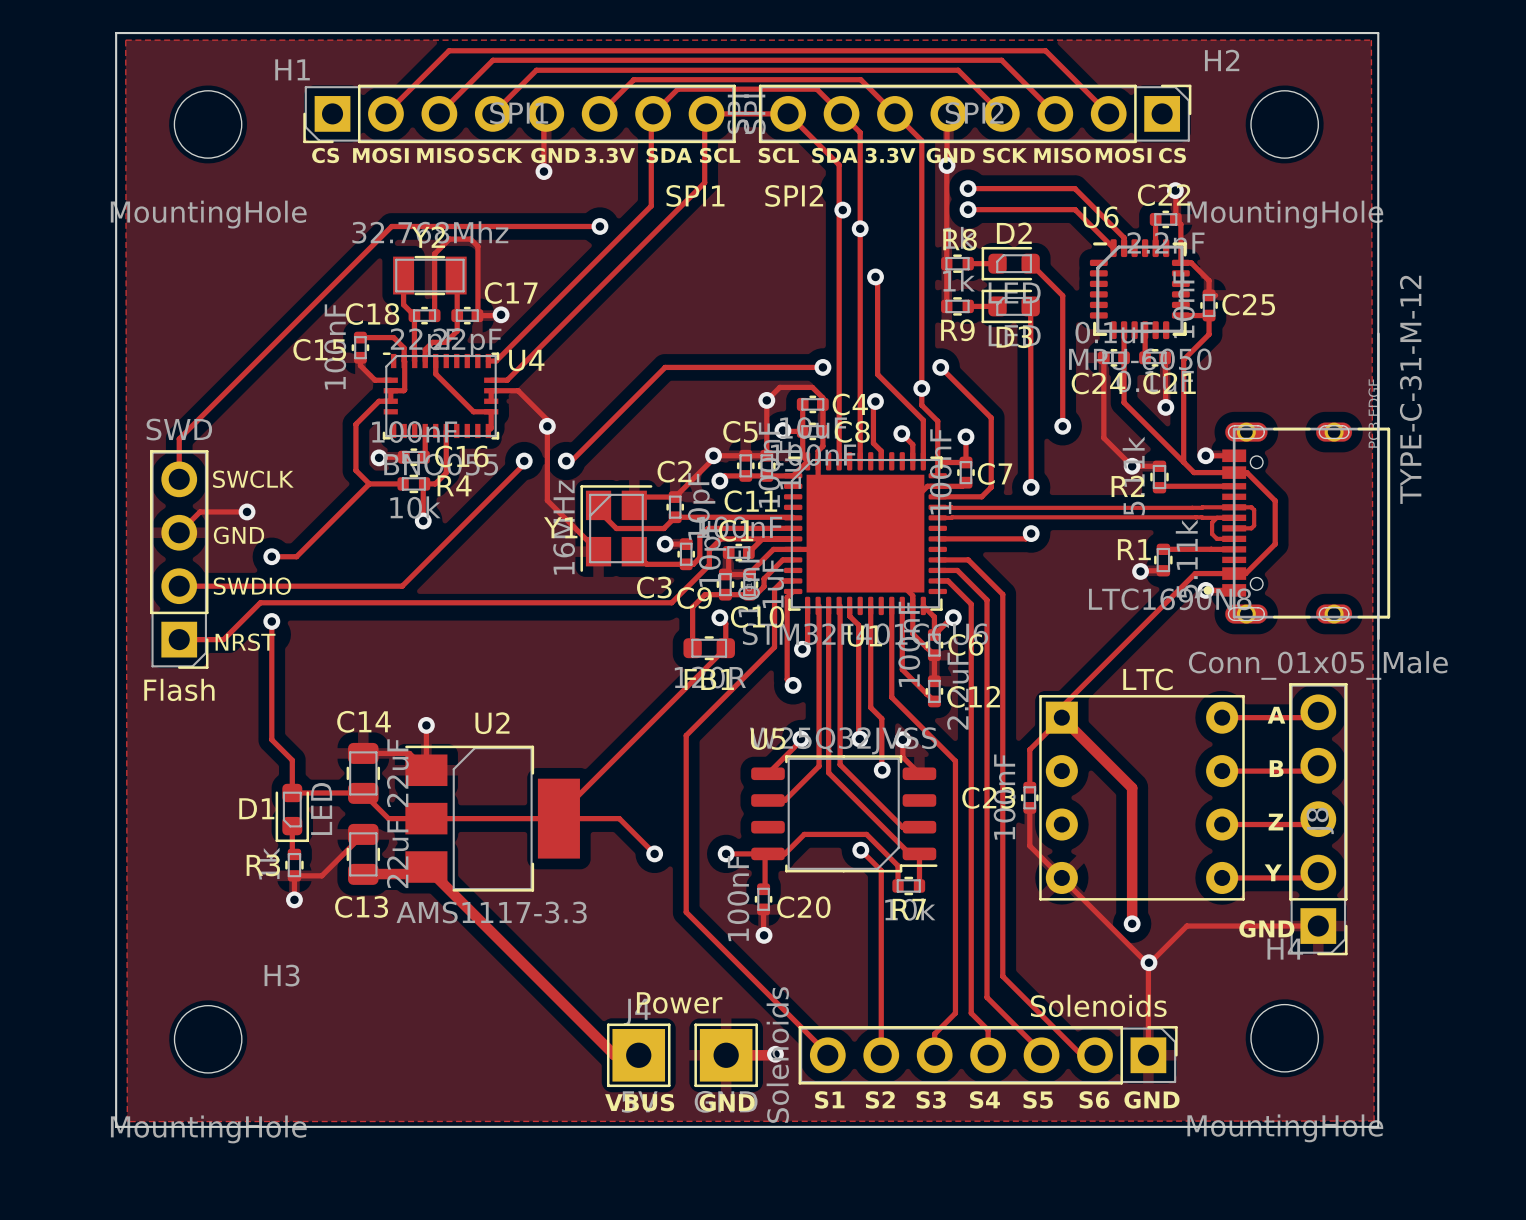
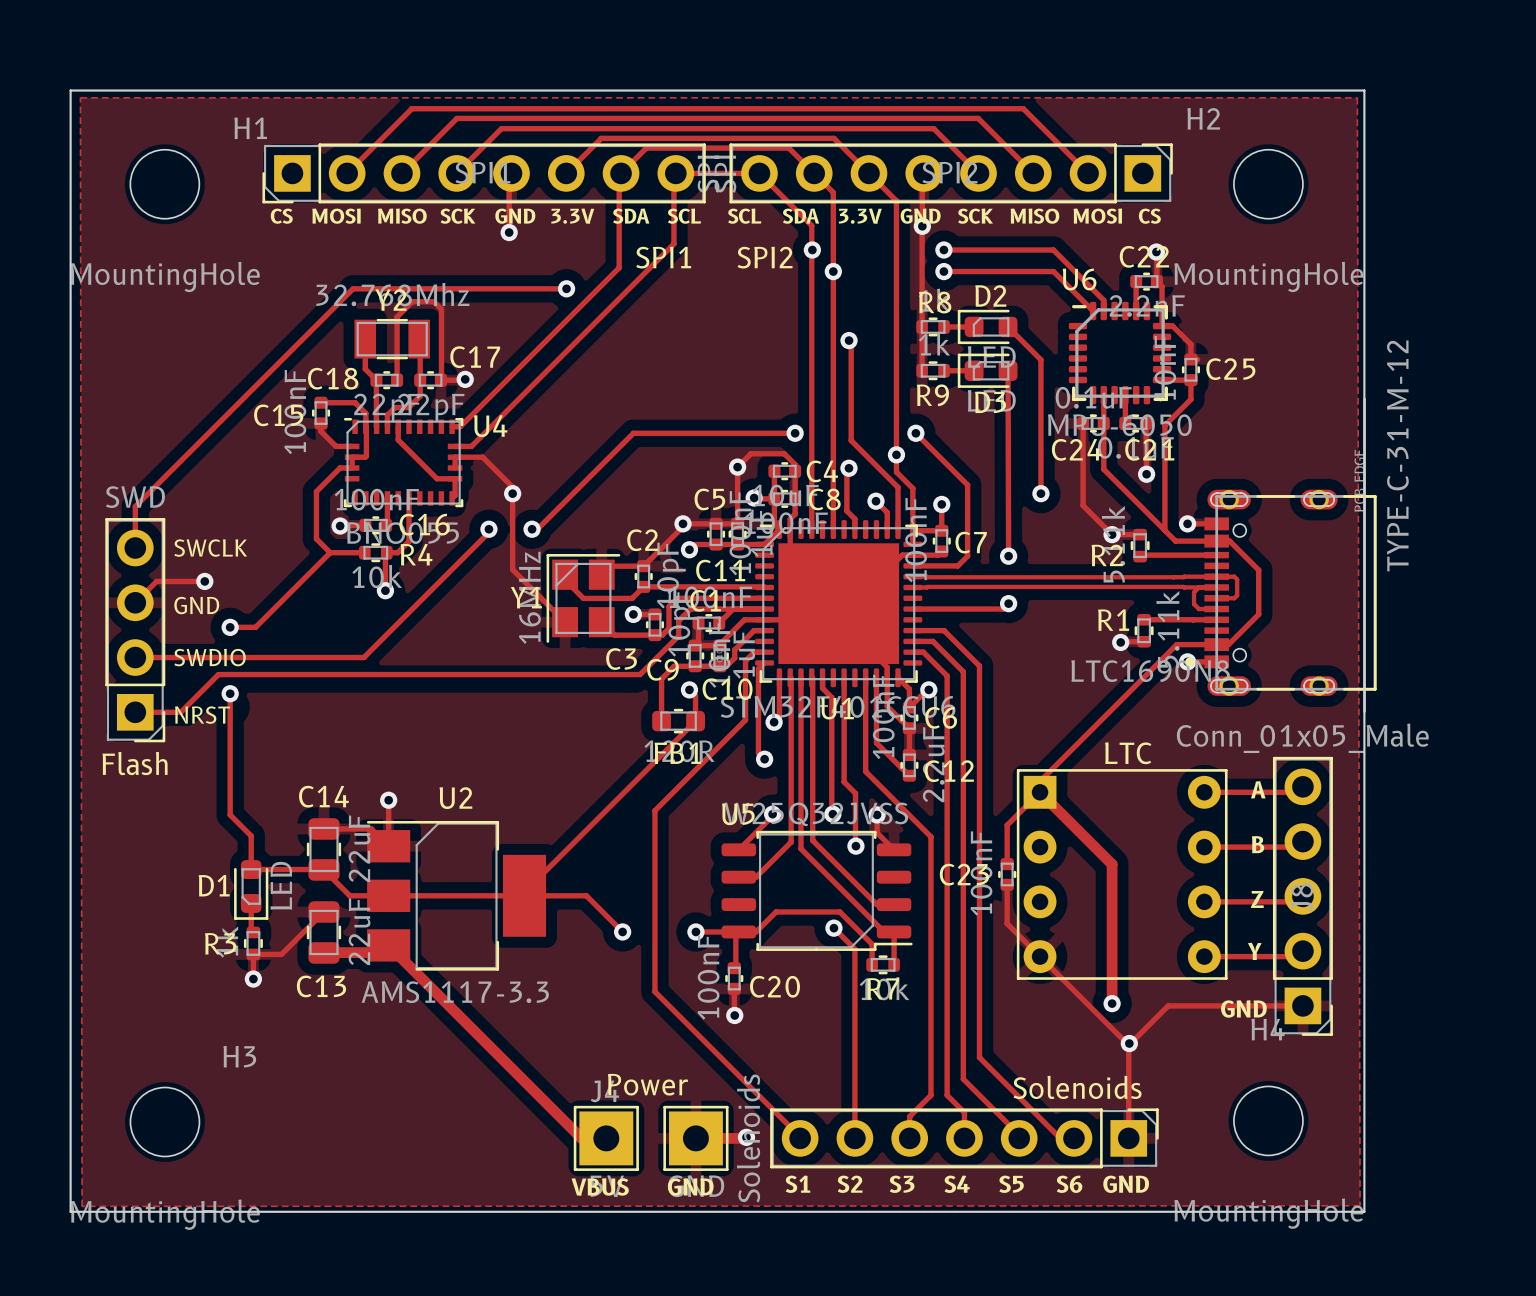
via: none -> (812, 250)
via: none -> (833, 271)
via: (842, 210) -> none
via: (860, 228) -> none

